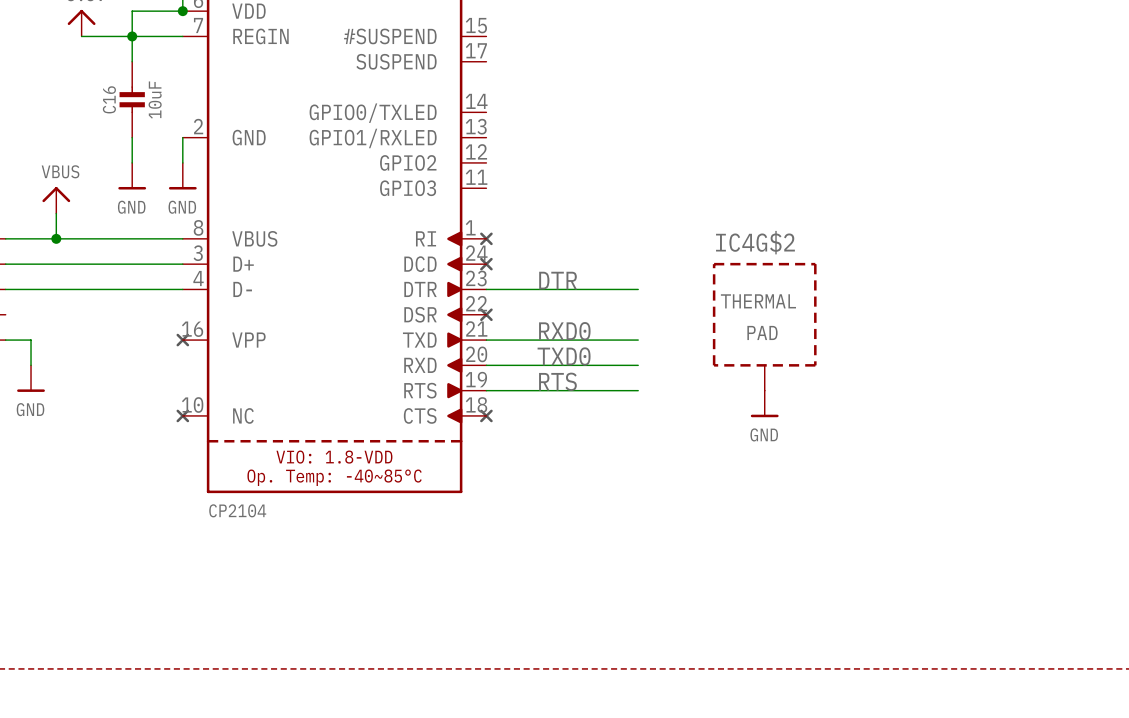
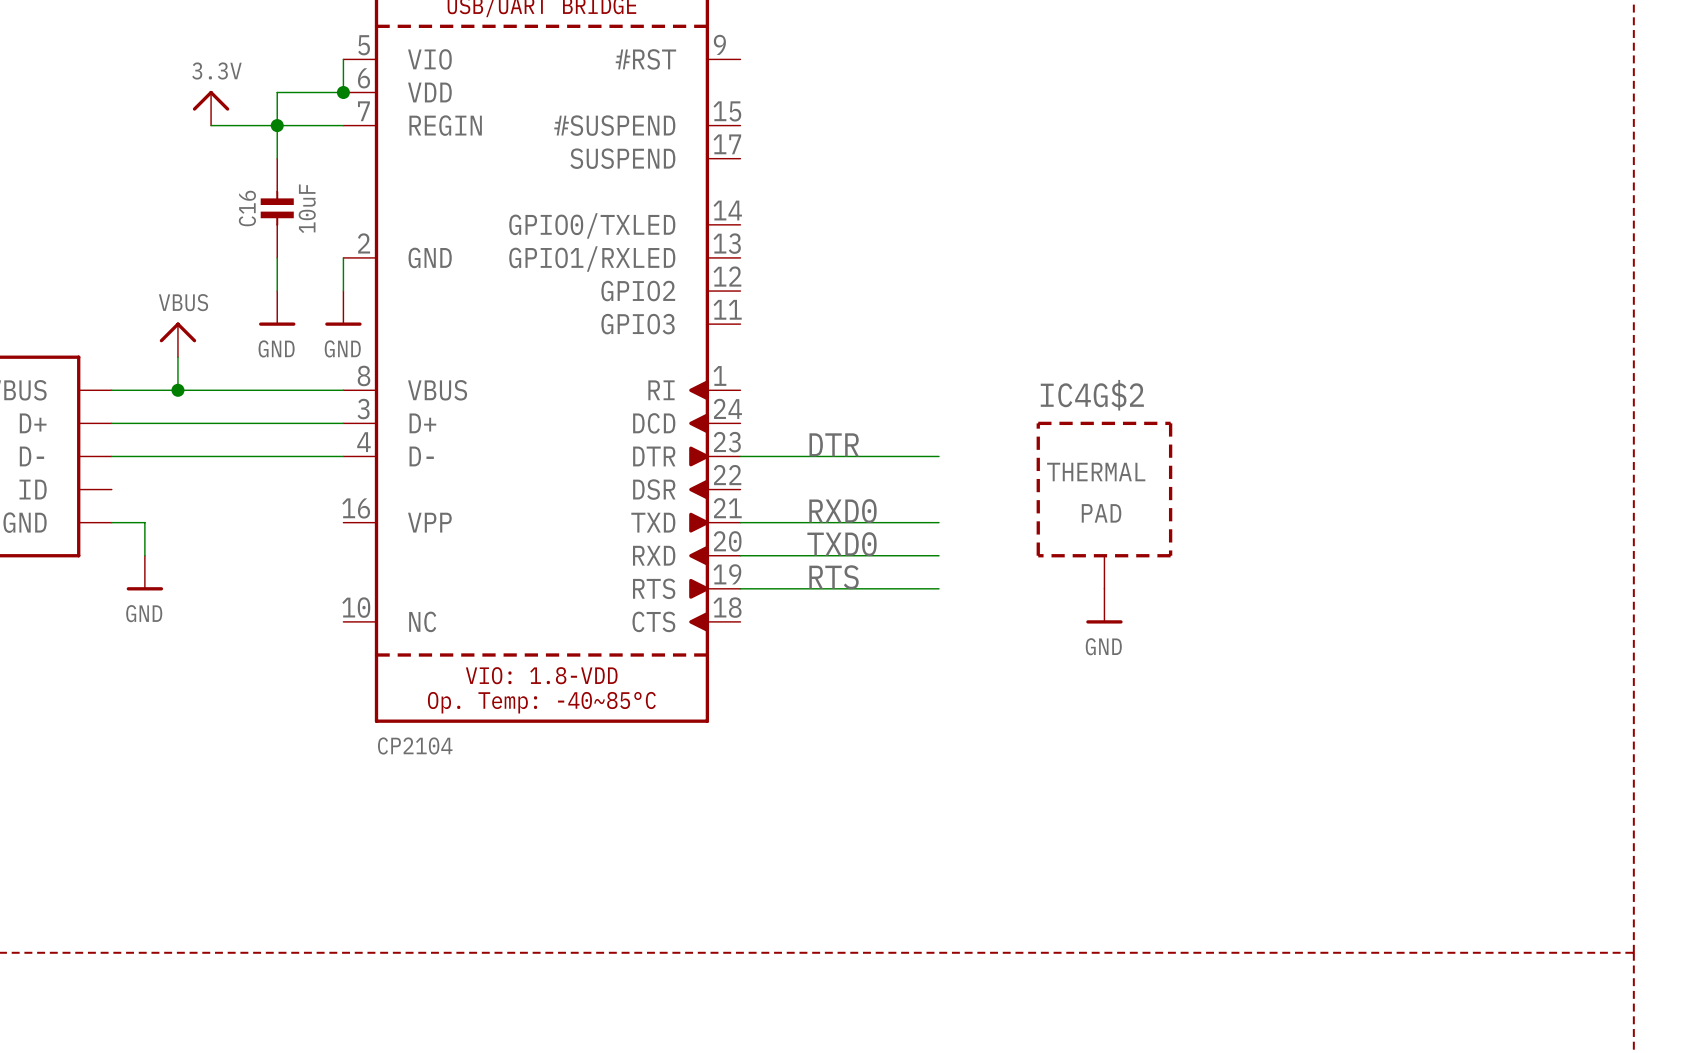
part: (486, 238) -> none
part: (486, 264) -> none
part: (486, 314) -> none
part: (182, 340) -> none
part: (182, 415) -> none
part: (486, 415) -> none

